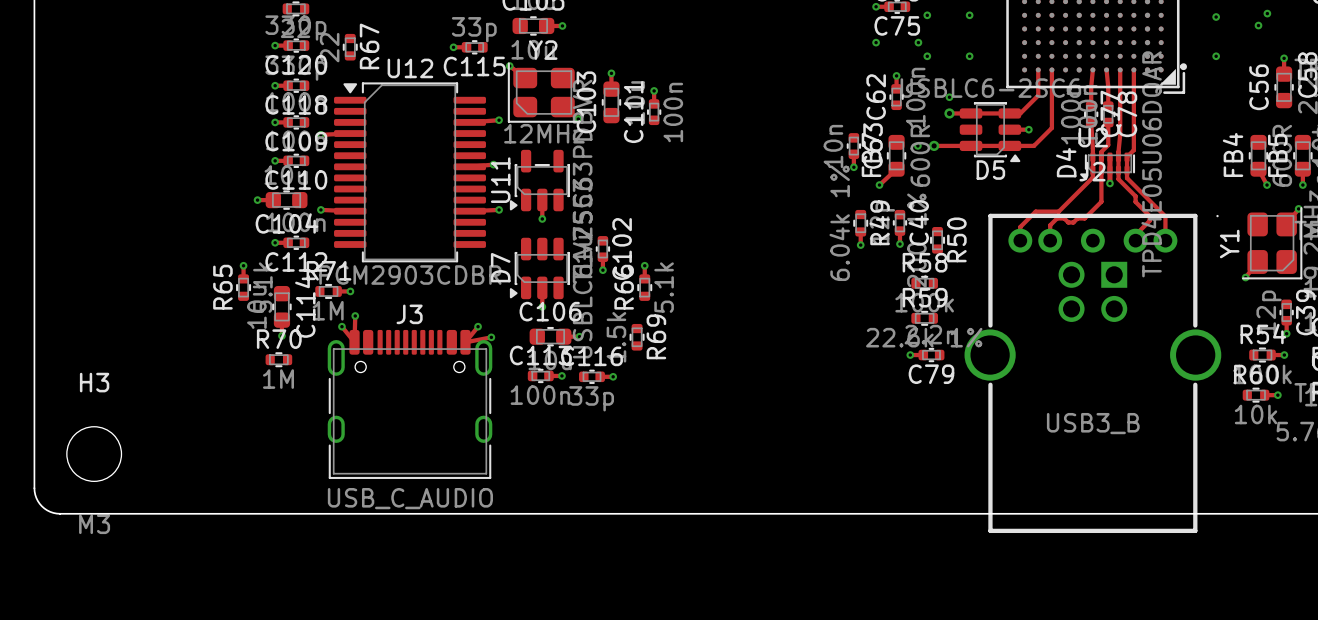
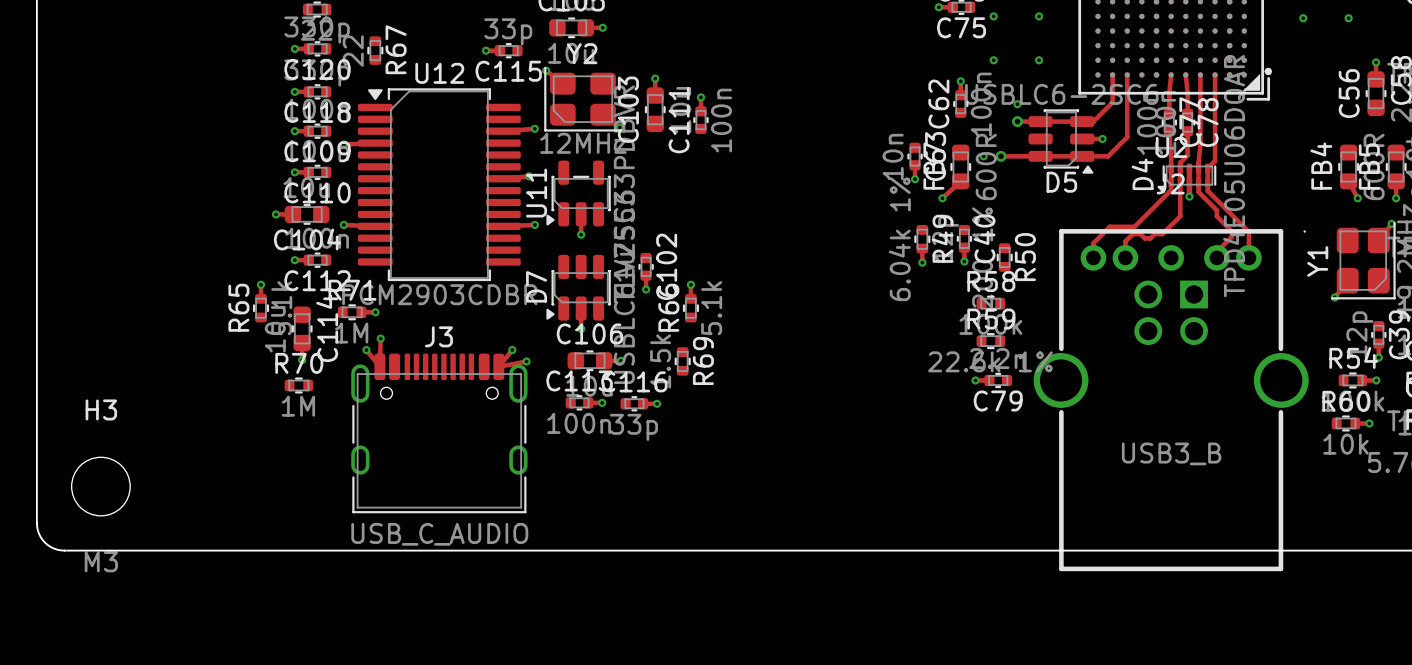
via: (1267, 13) -> none
via: none -> (1348, 18)
via: (1258, 25) -> none
via: (876, 42) -> none
via: (918, 42) -> none
via: (1216, 56) -> none

